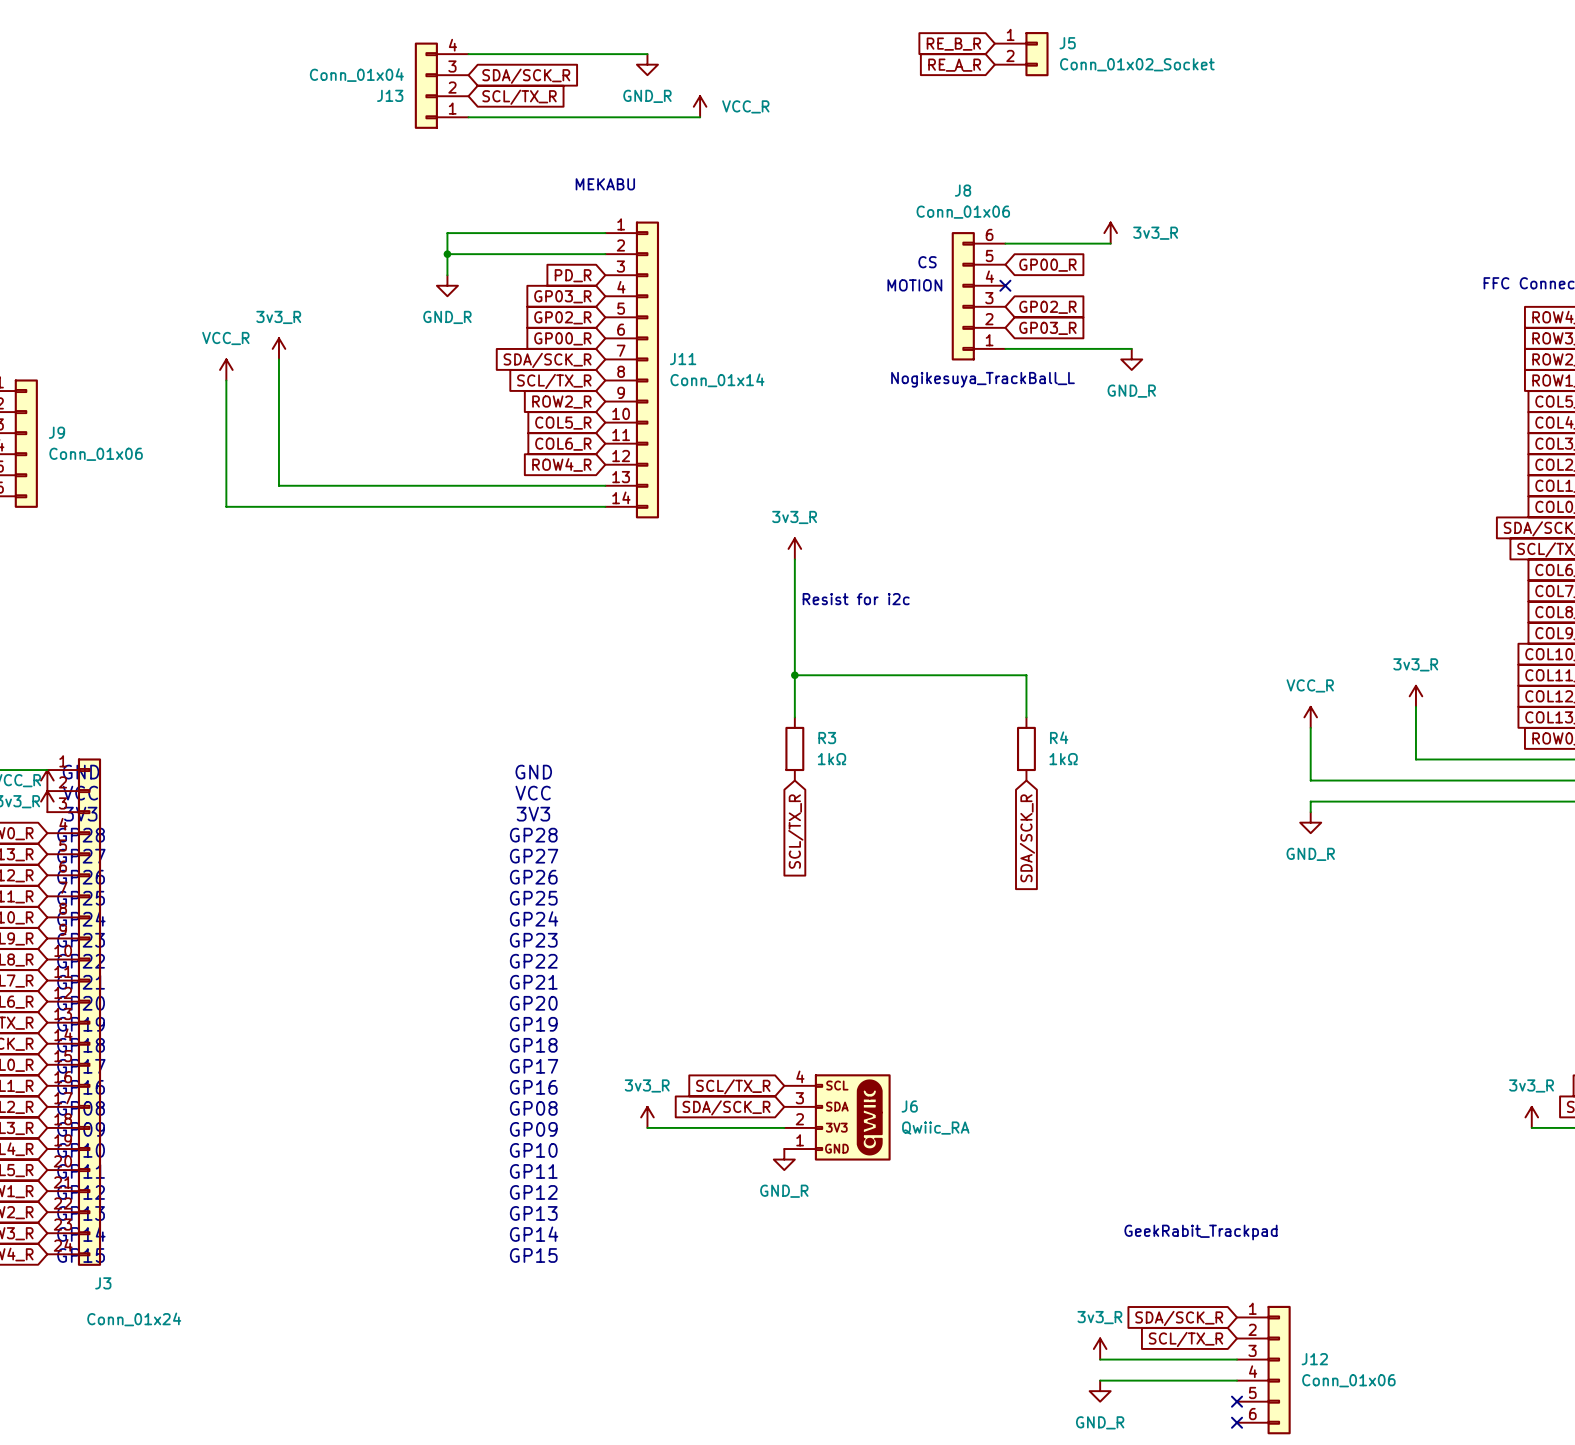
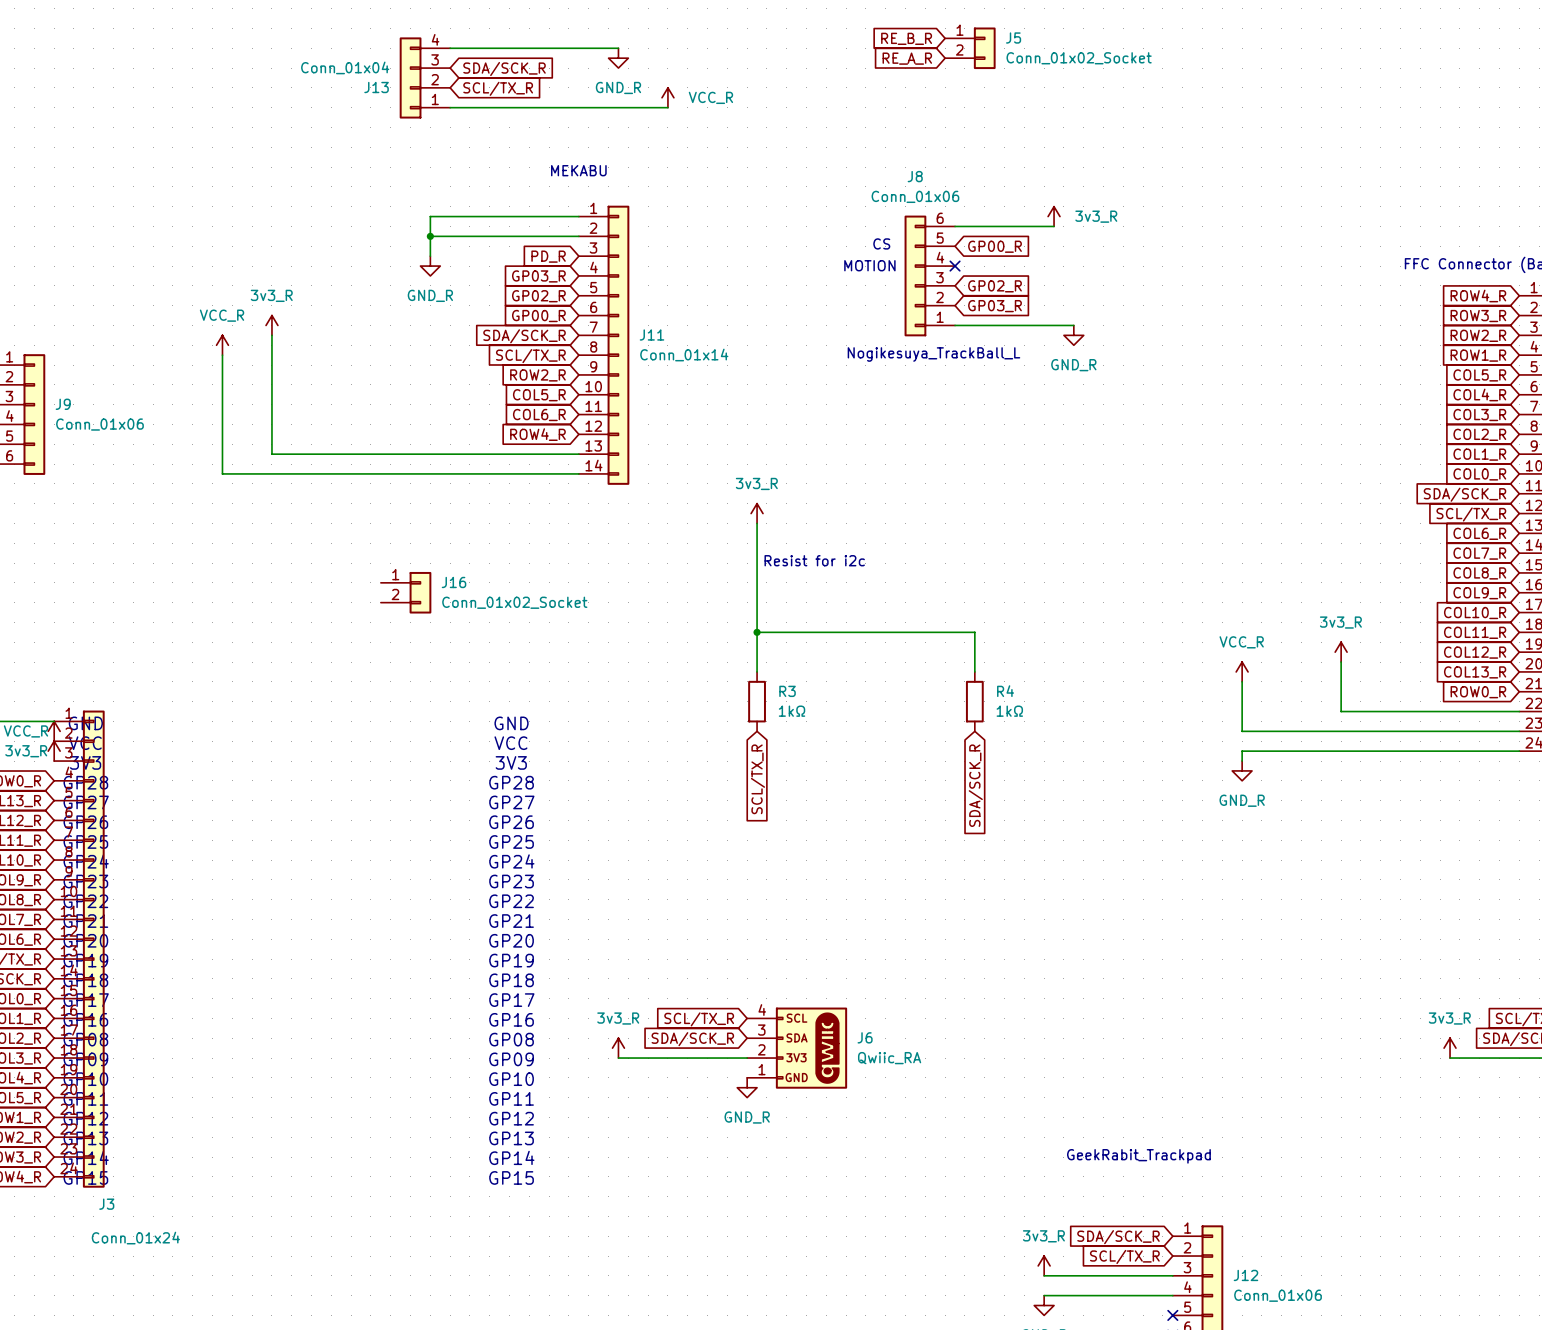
J16: none -> Conn_01x02_Socket (406, 592)

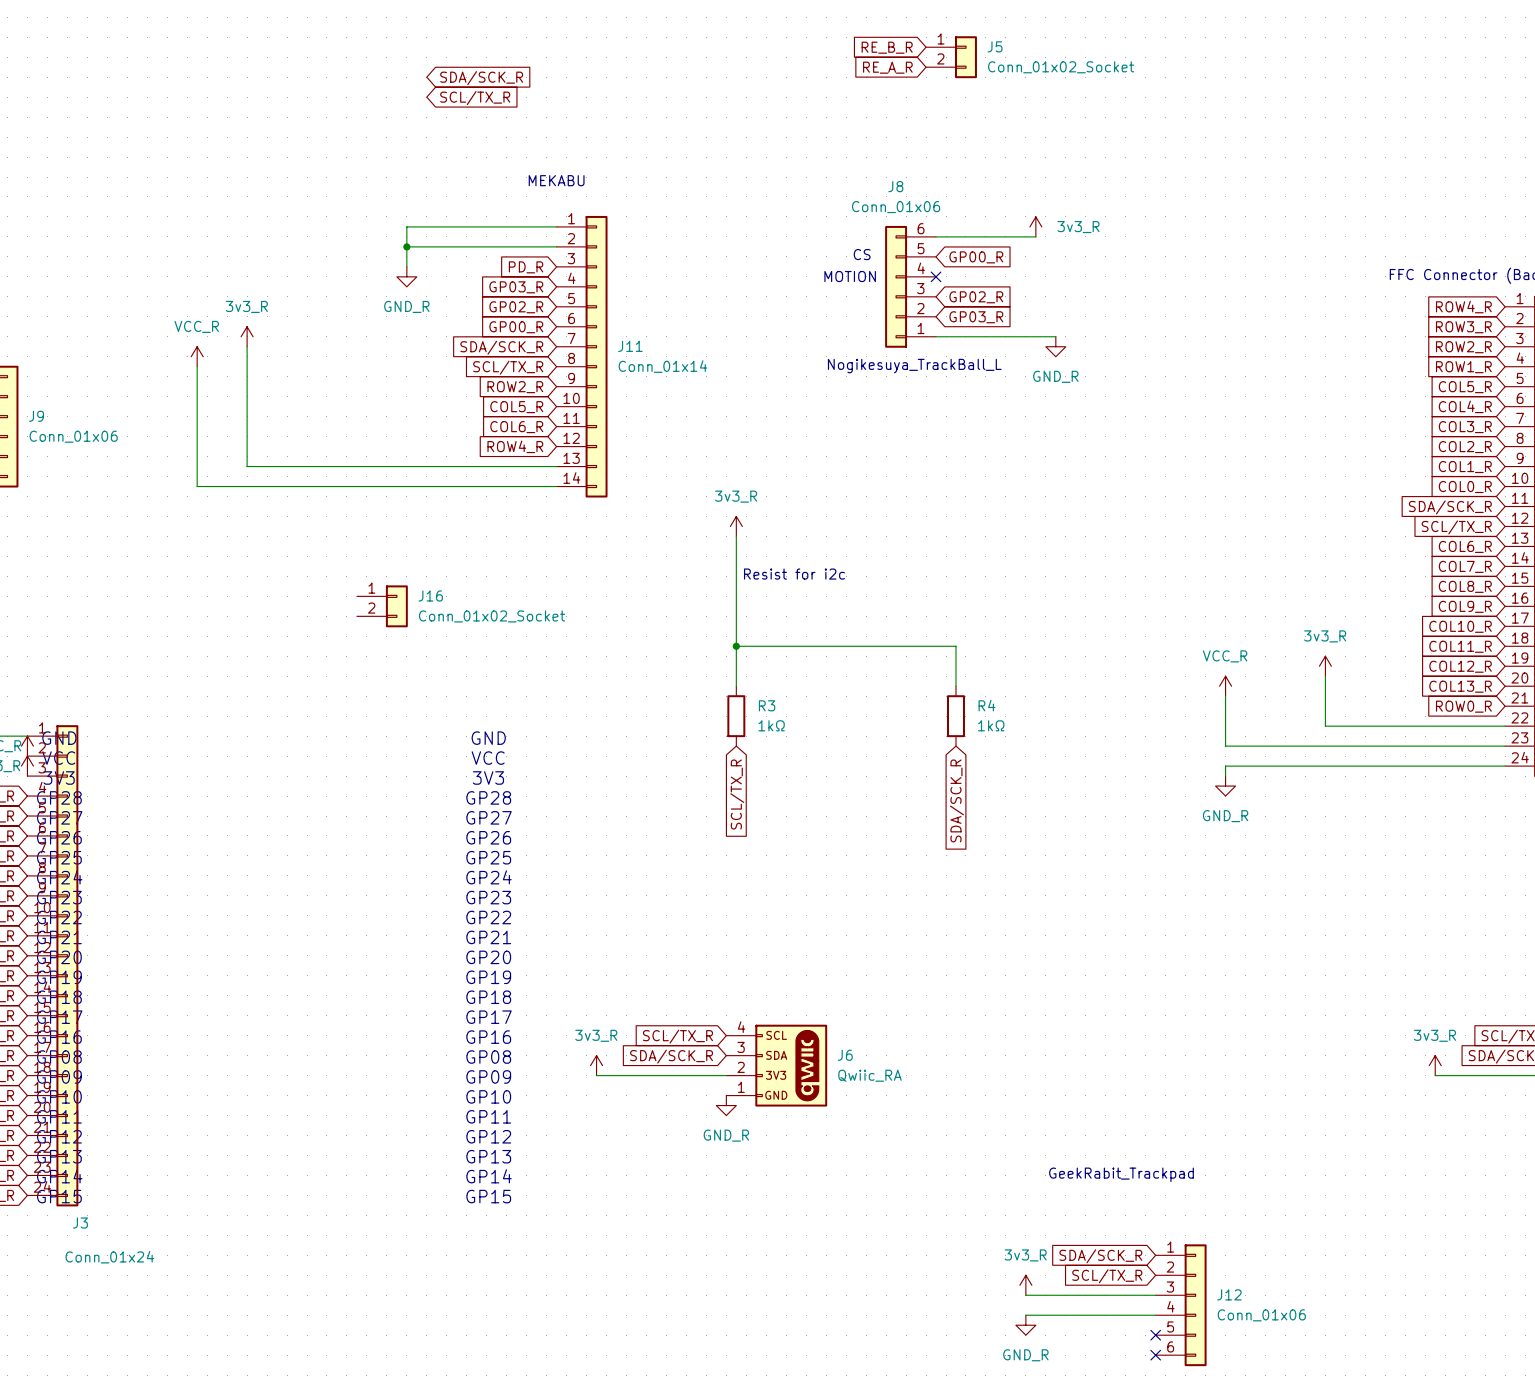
wire: (450, 48) (618, 48) -> none
power symbol: GND_R (618, 58) -> none
J13: Conn_01x04 (424, 77) -> none
power symbol: VCC_R (667, 97) -> none
wire: (450, 107) (667, 107) -> none

